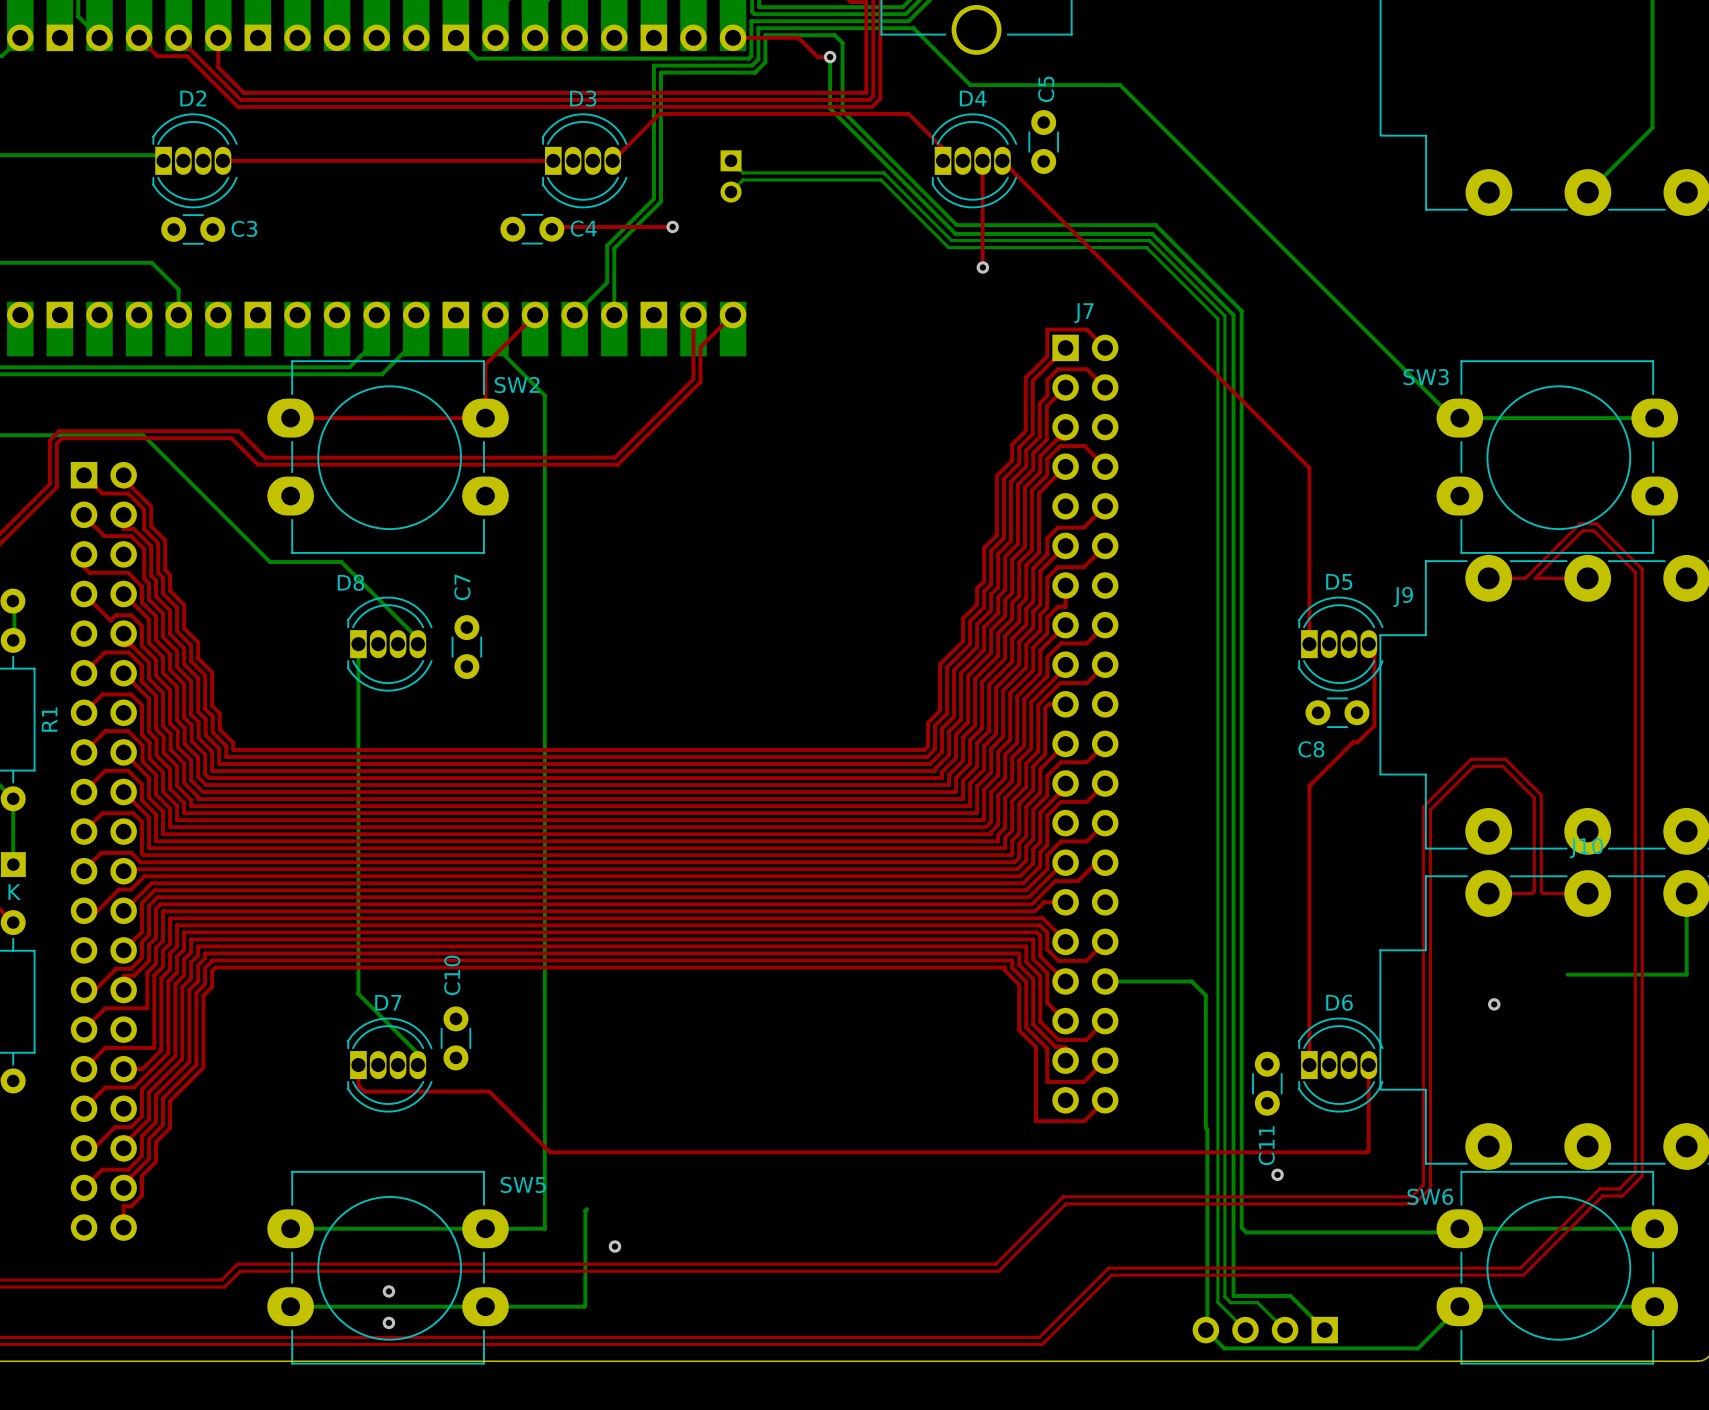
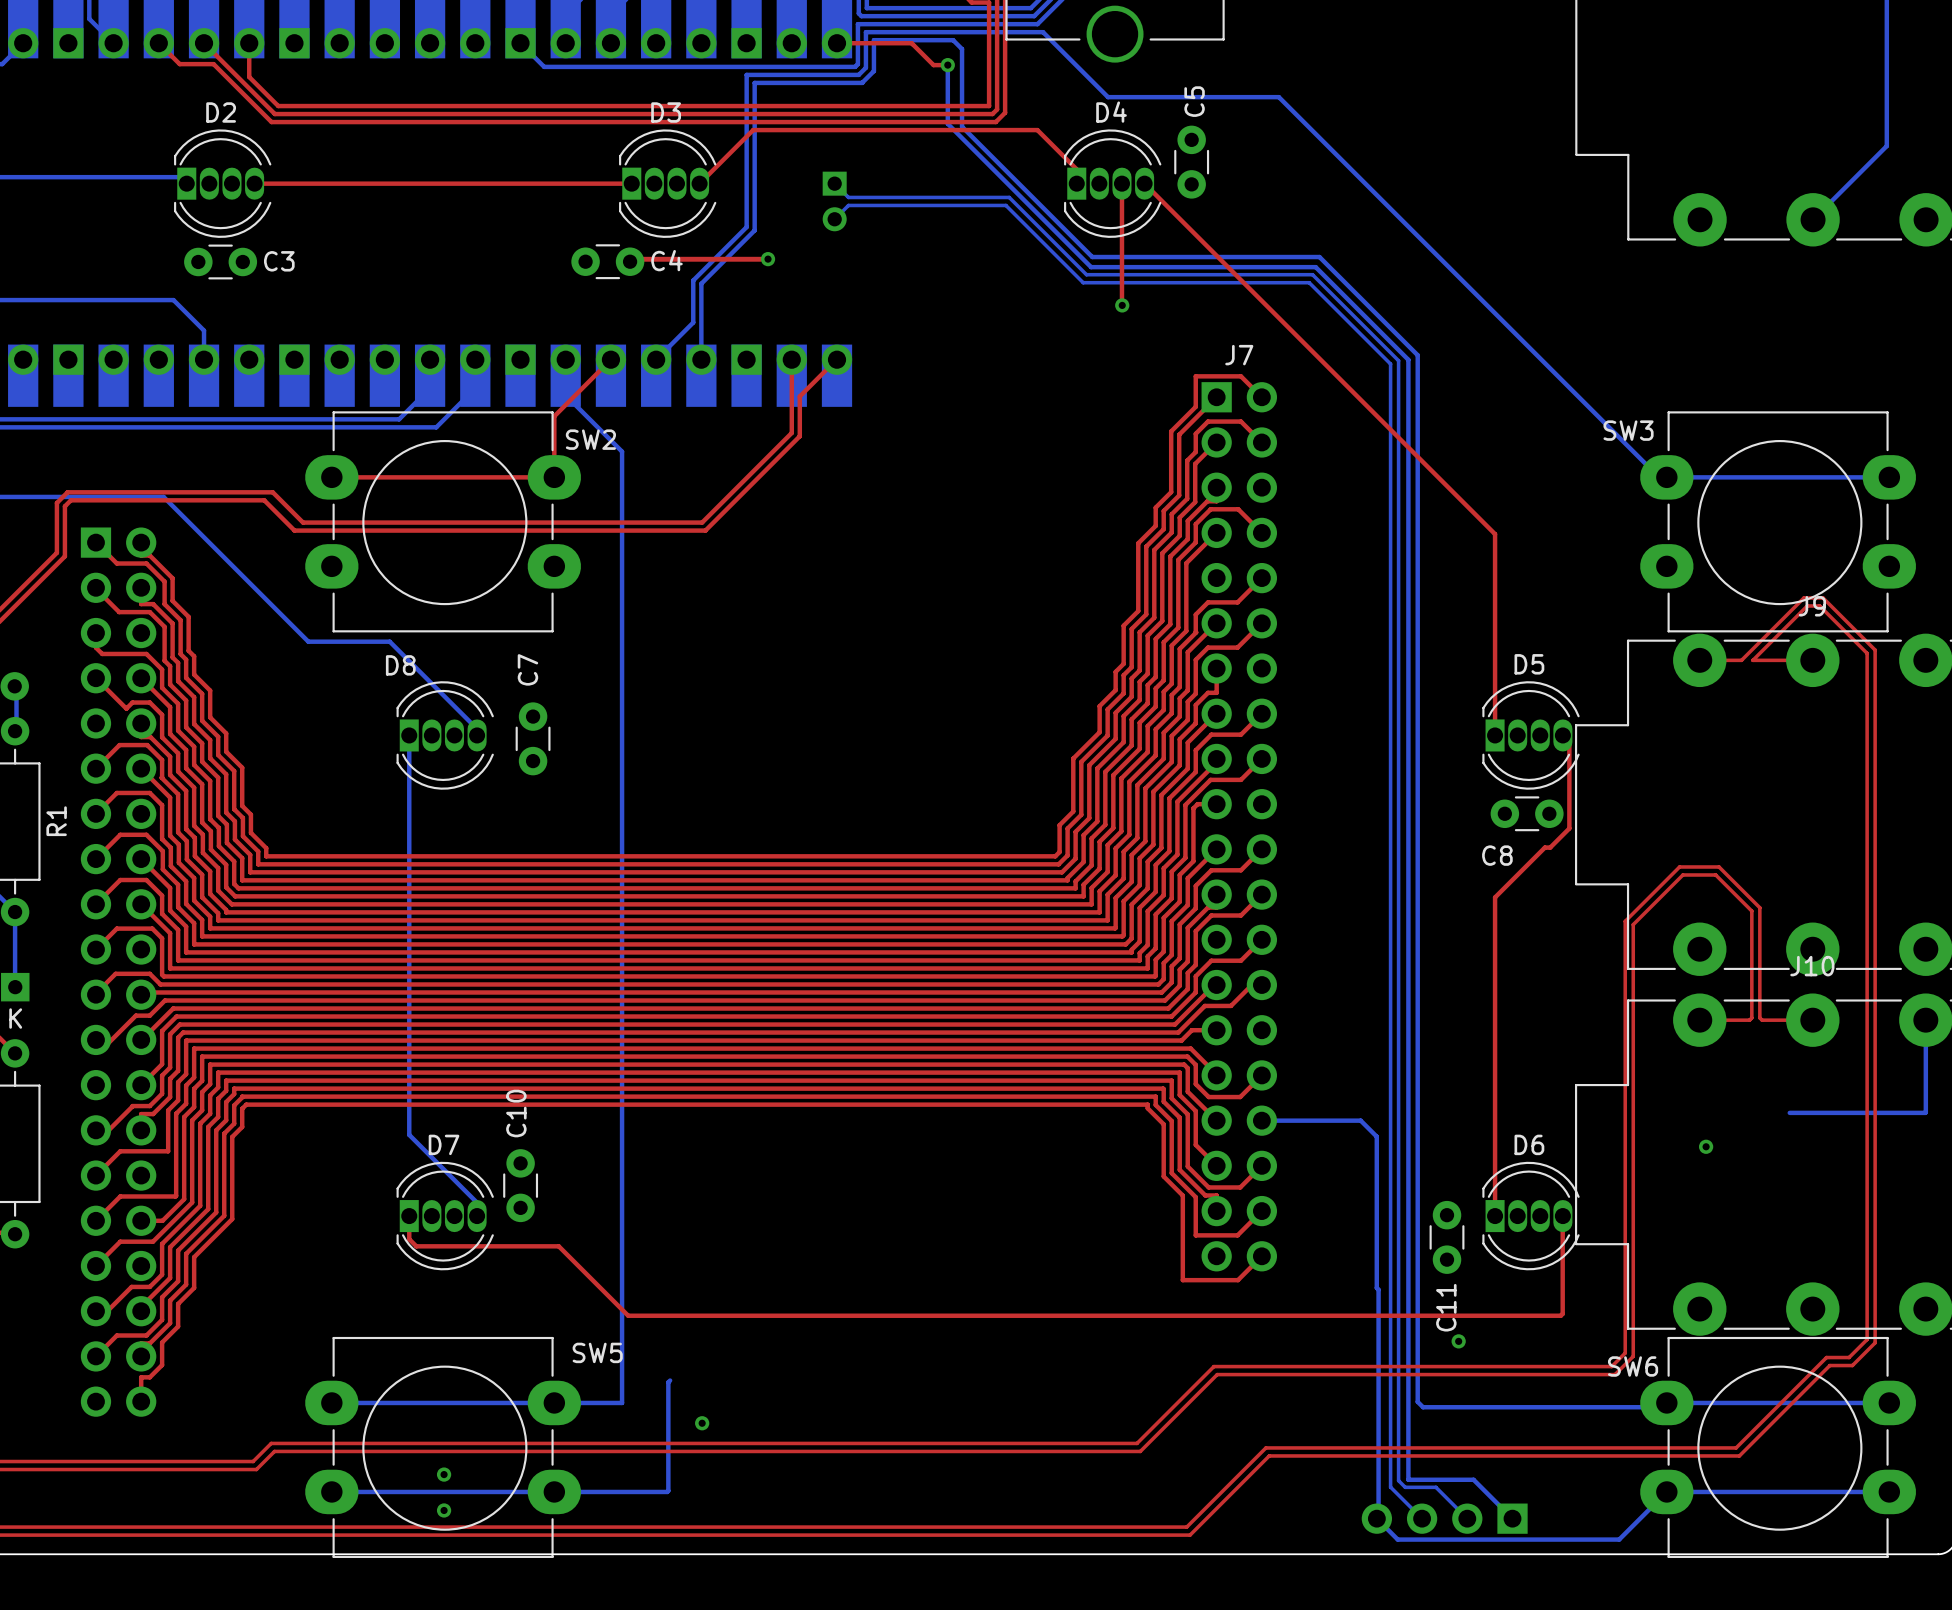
J9 name position: J9 (1403, 596) -> J9 (1812, 606)

